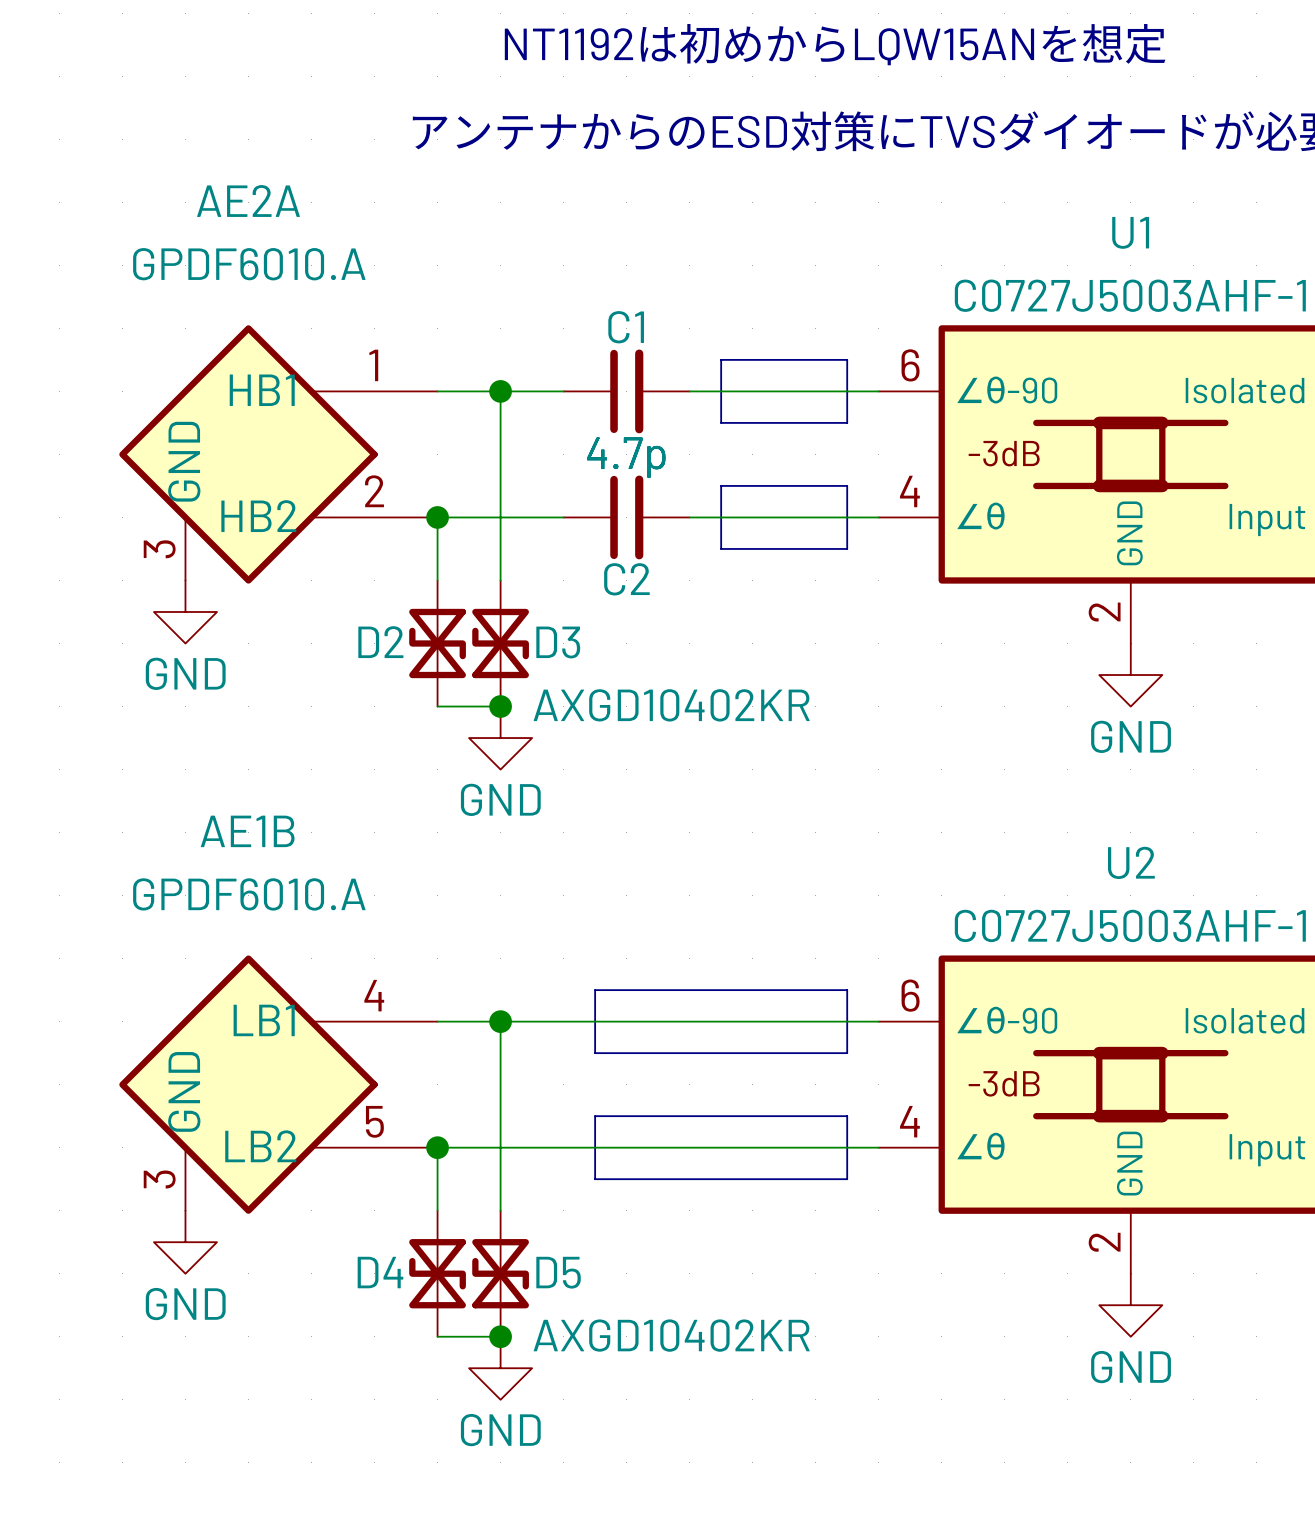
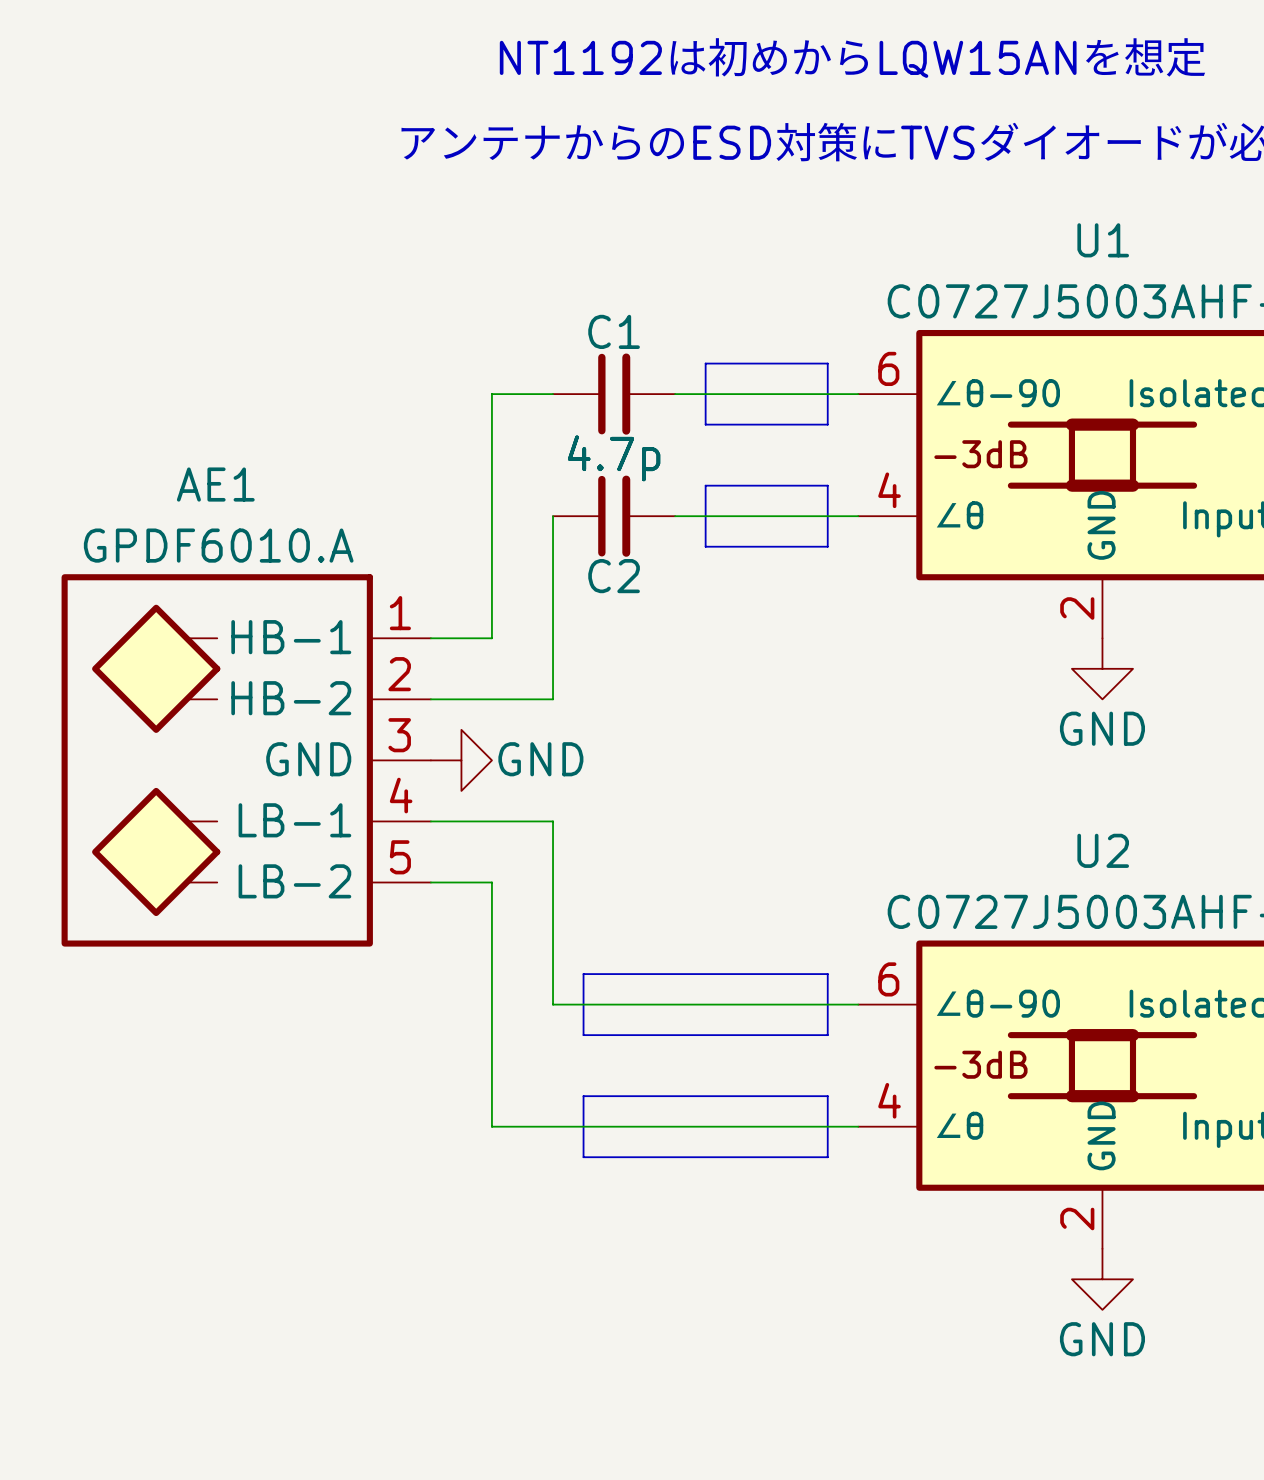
wire: (437, 391) (500, 391) -> none
junction: (500, 391) -> none
AE2A: GPDF6010.A (278, 454) -> none
junction: (437, 517) -> none
wire: (563, 517) (437, 517) (437, 580) -> (553, 516) (553, 699) (491, 699)
power symbol: GND (185, 611) -> none
D2: (437, 643) -> none
D3: AXGD10402KR (500, 643) -> none
junction: (500, 706) -> none
power symbol rotation: 0° (500, 738) -> 90° counterclockwise (461, 760)
power symbol position: GND (500, 738) -> GND (461, 760)
AE1: none -> GPDF6010.A (246, 760)
wire: none -> (430, 882) (491, 882) (491, 1004)
wire: (437, 1021) (563, 1021) -> (430, 821) (553, 821) (553, 1004)
junction: (500, 1021) -> none
AE1B: GPDF6010.A (278, 1084) -> none
junction: (437, 1147) -> none
wire: (437, 1210) (437, 1147) (500, 1147) (500, 1210) -> none
power symbol: GND (185, 1242) -> none
D4: (437, 1273) -> none
D5: AXGD10402KR (500, 1273) -> none
wire: (437, 1336) (500, 1336) -> none
junction: (500, 1336) -> none
power symbol: GND (500, 1368) -> none

